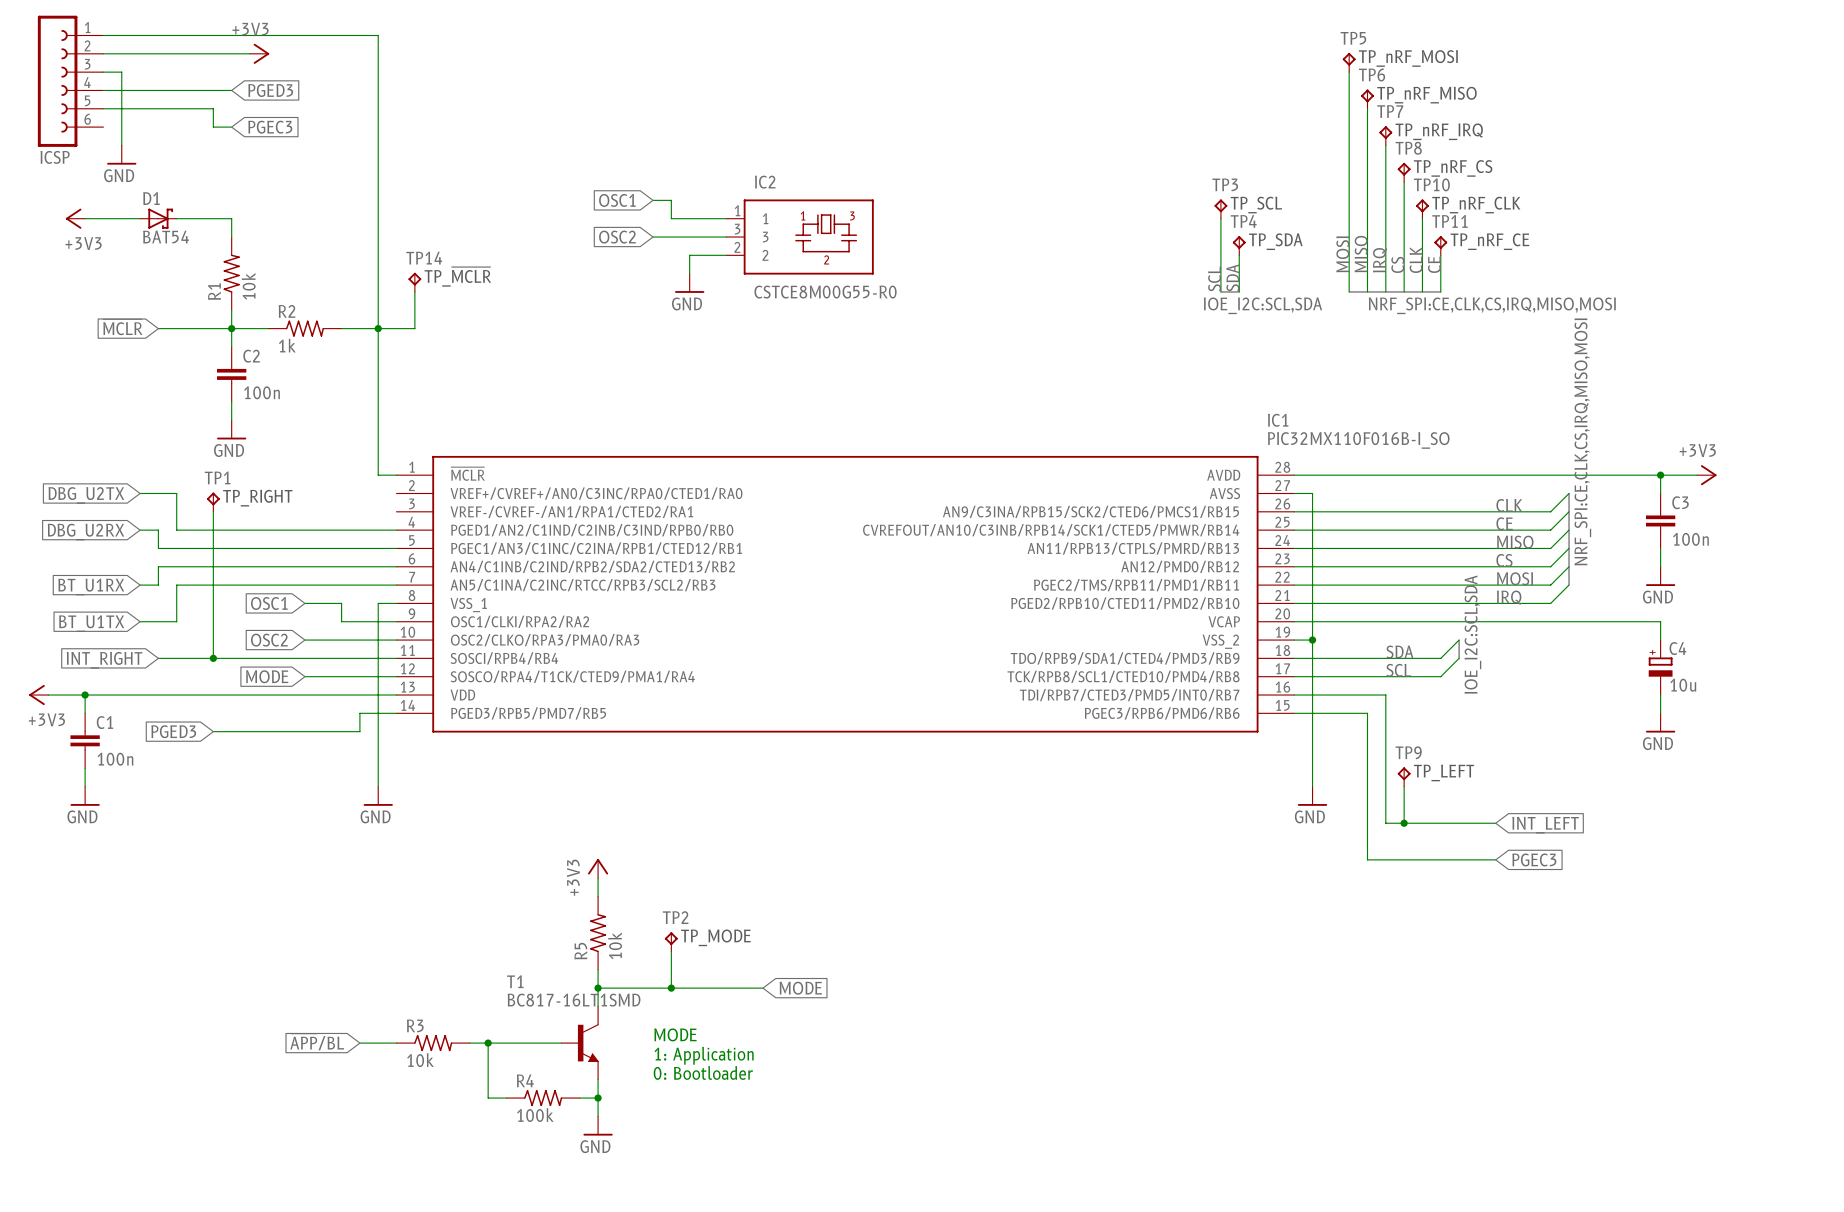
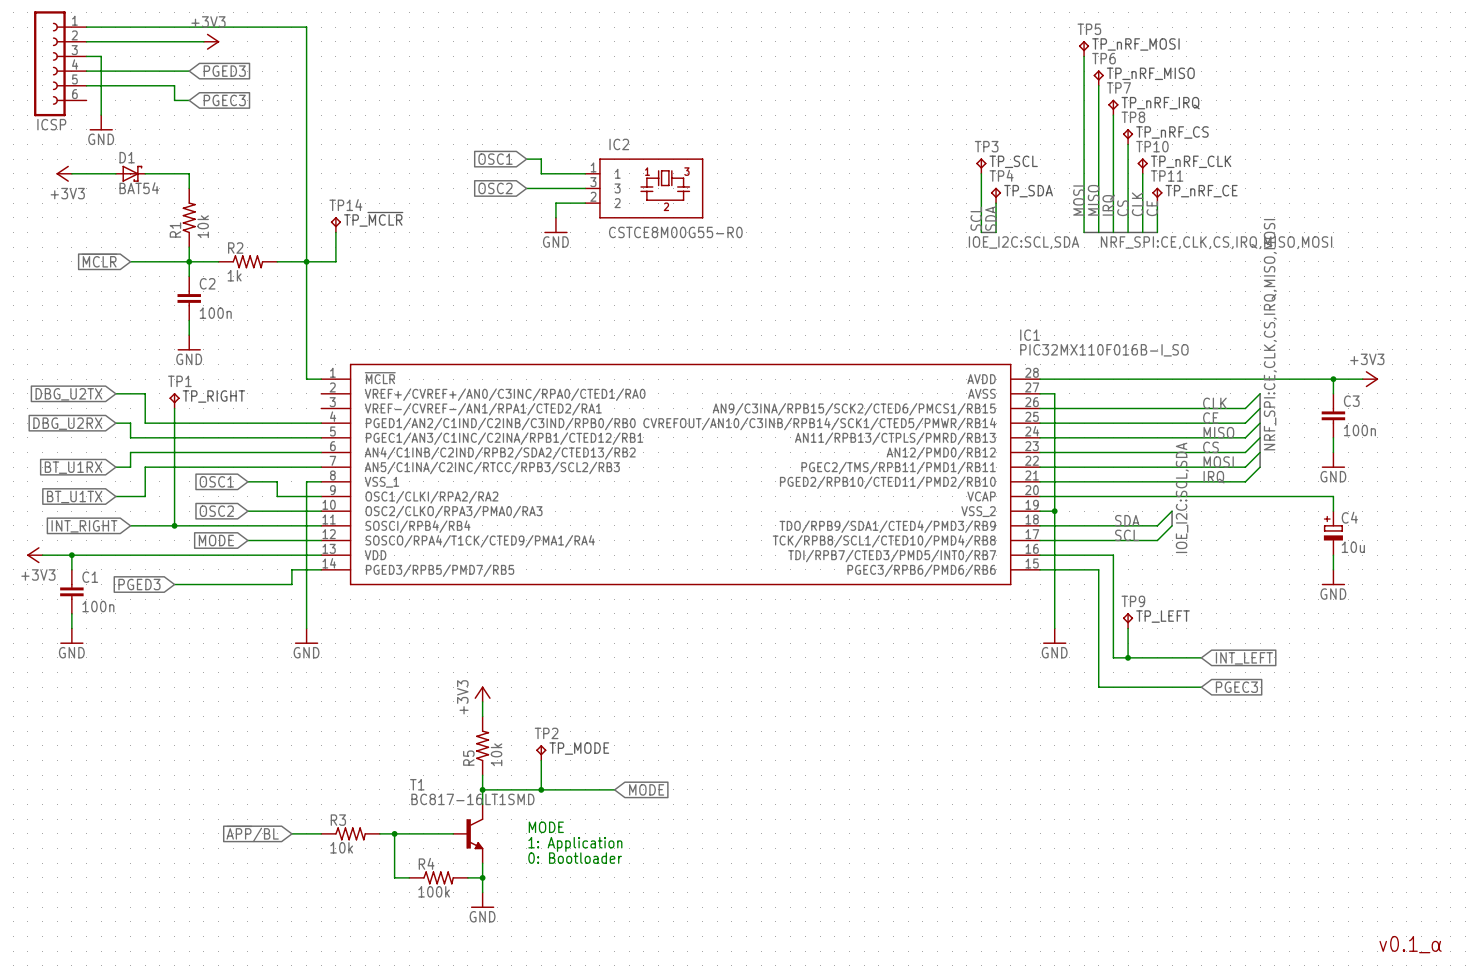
text: none -> v0.1_α (1410, 944)

